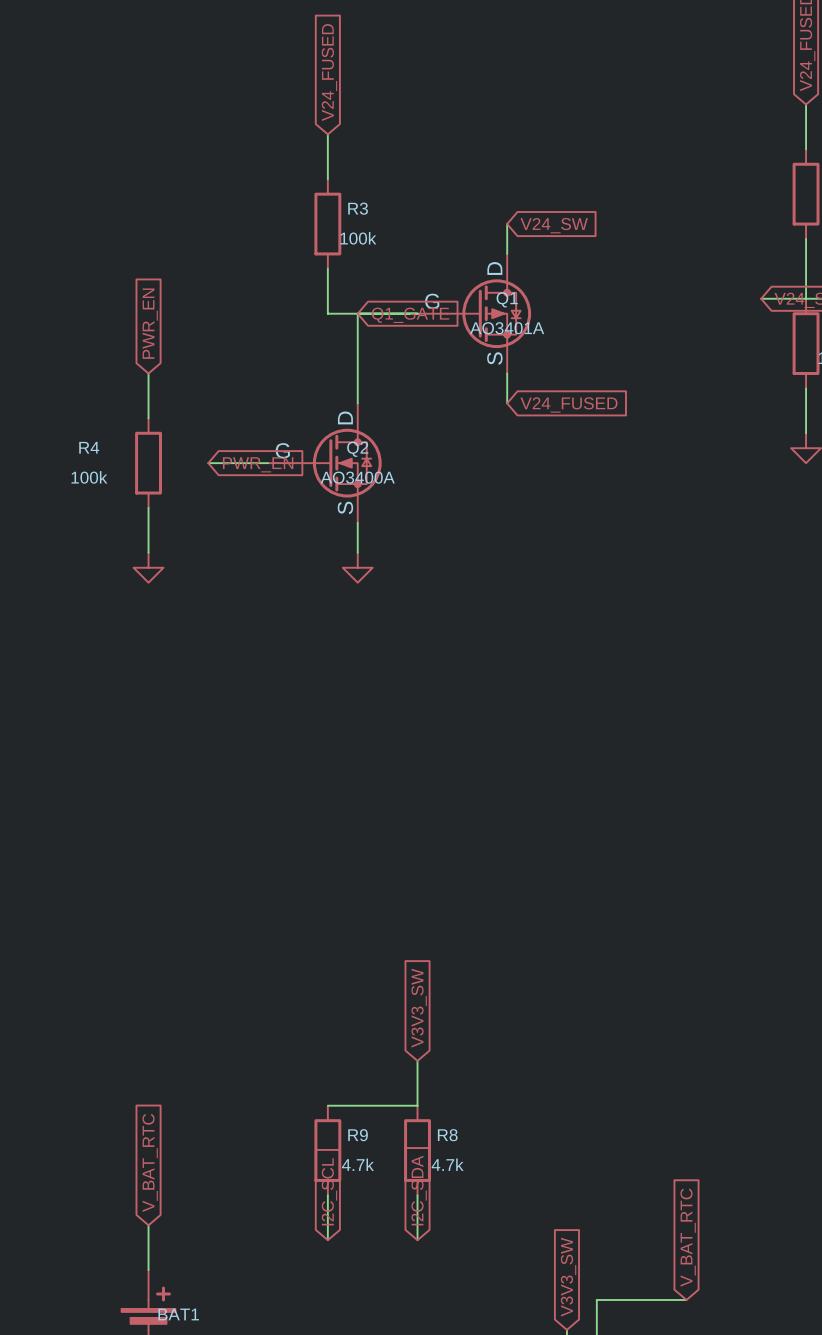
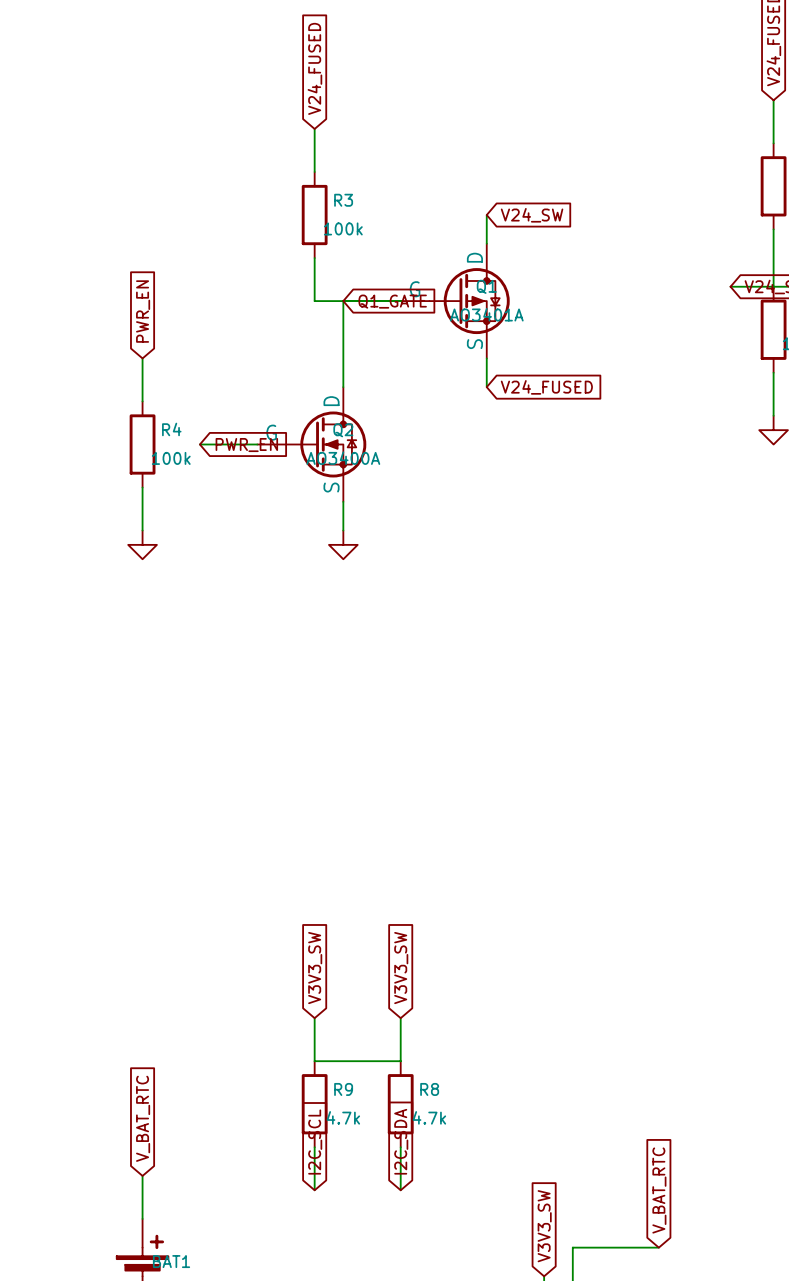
R4 name position: R4 (89, 447) -> R4 (171, 429)
R4 value position: 100k (89, 477) -> 100k (171, 458)
global label: none -> V3V3_SW (315, 968)
wire: none -> (314, 1018) (314, 1061)

